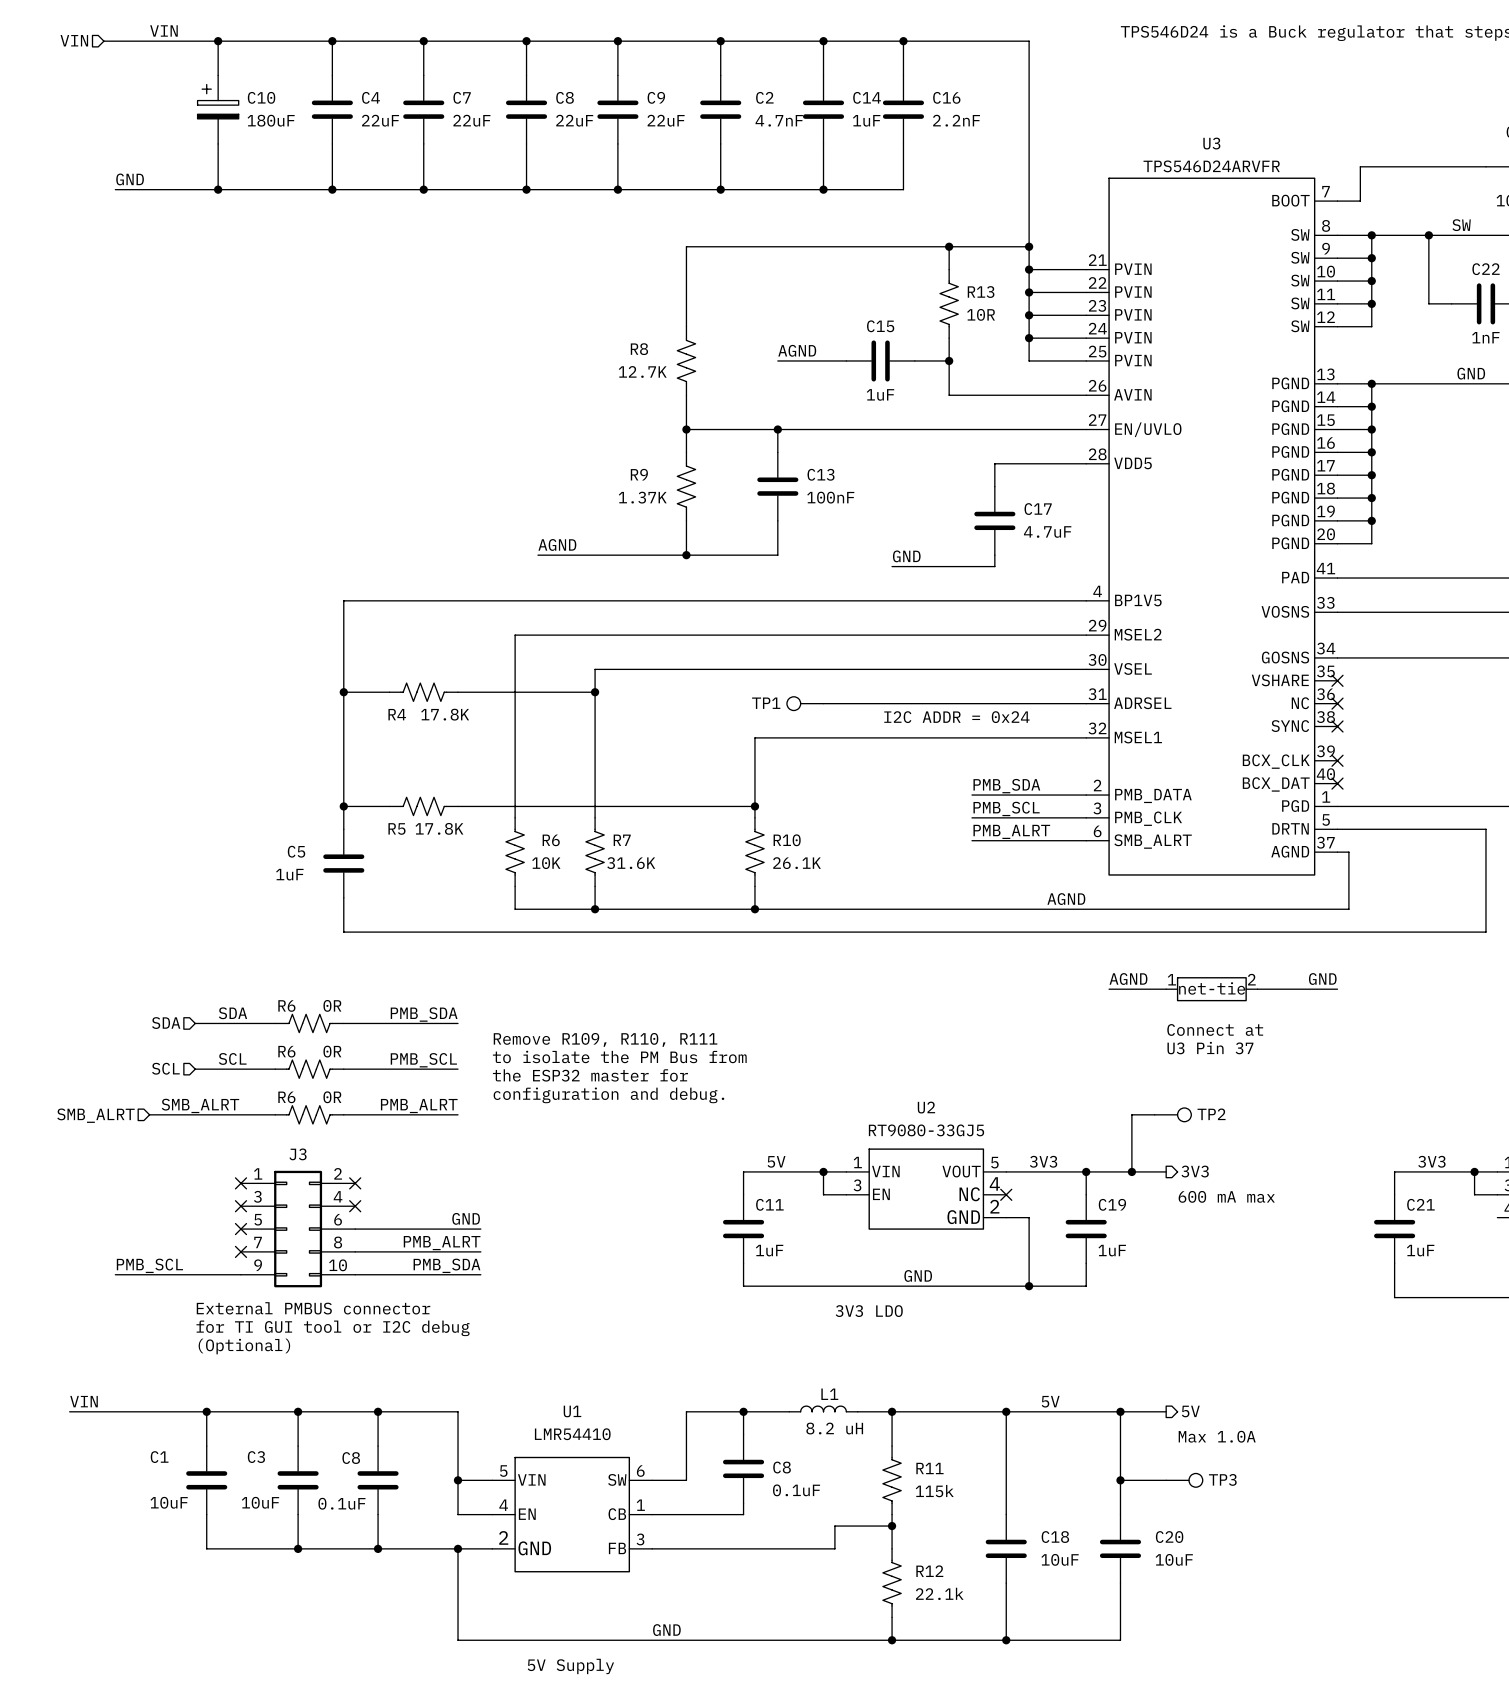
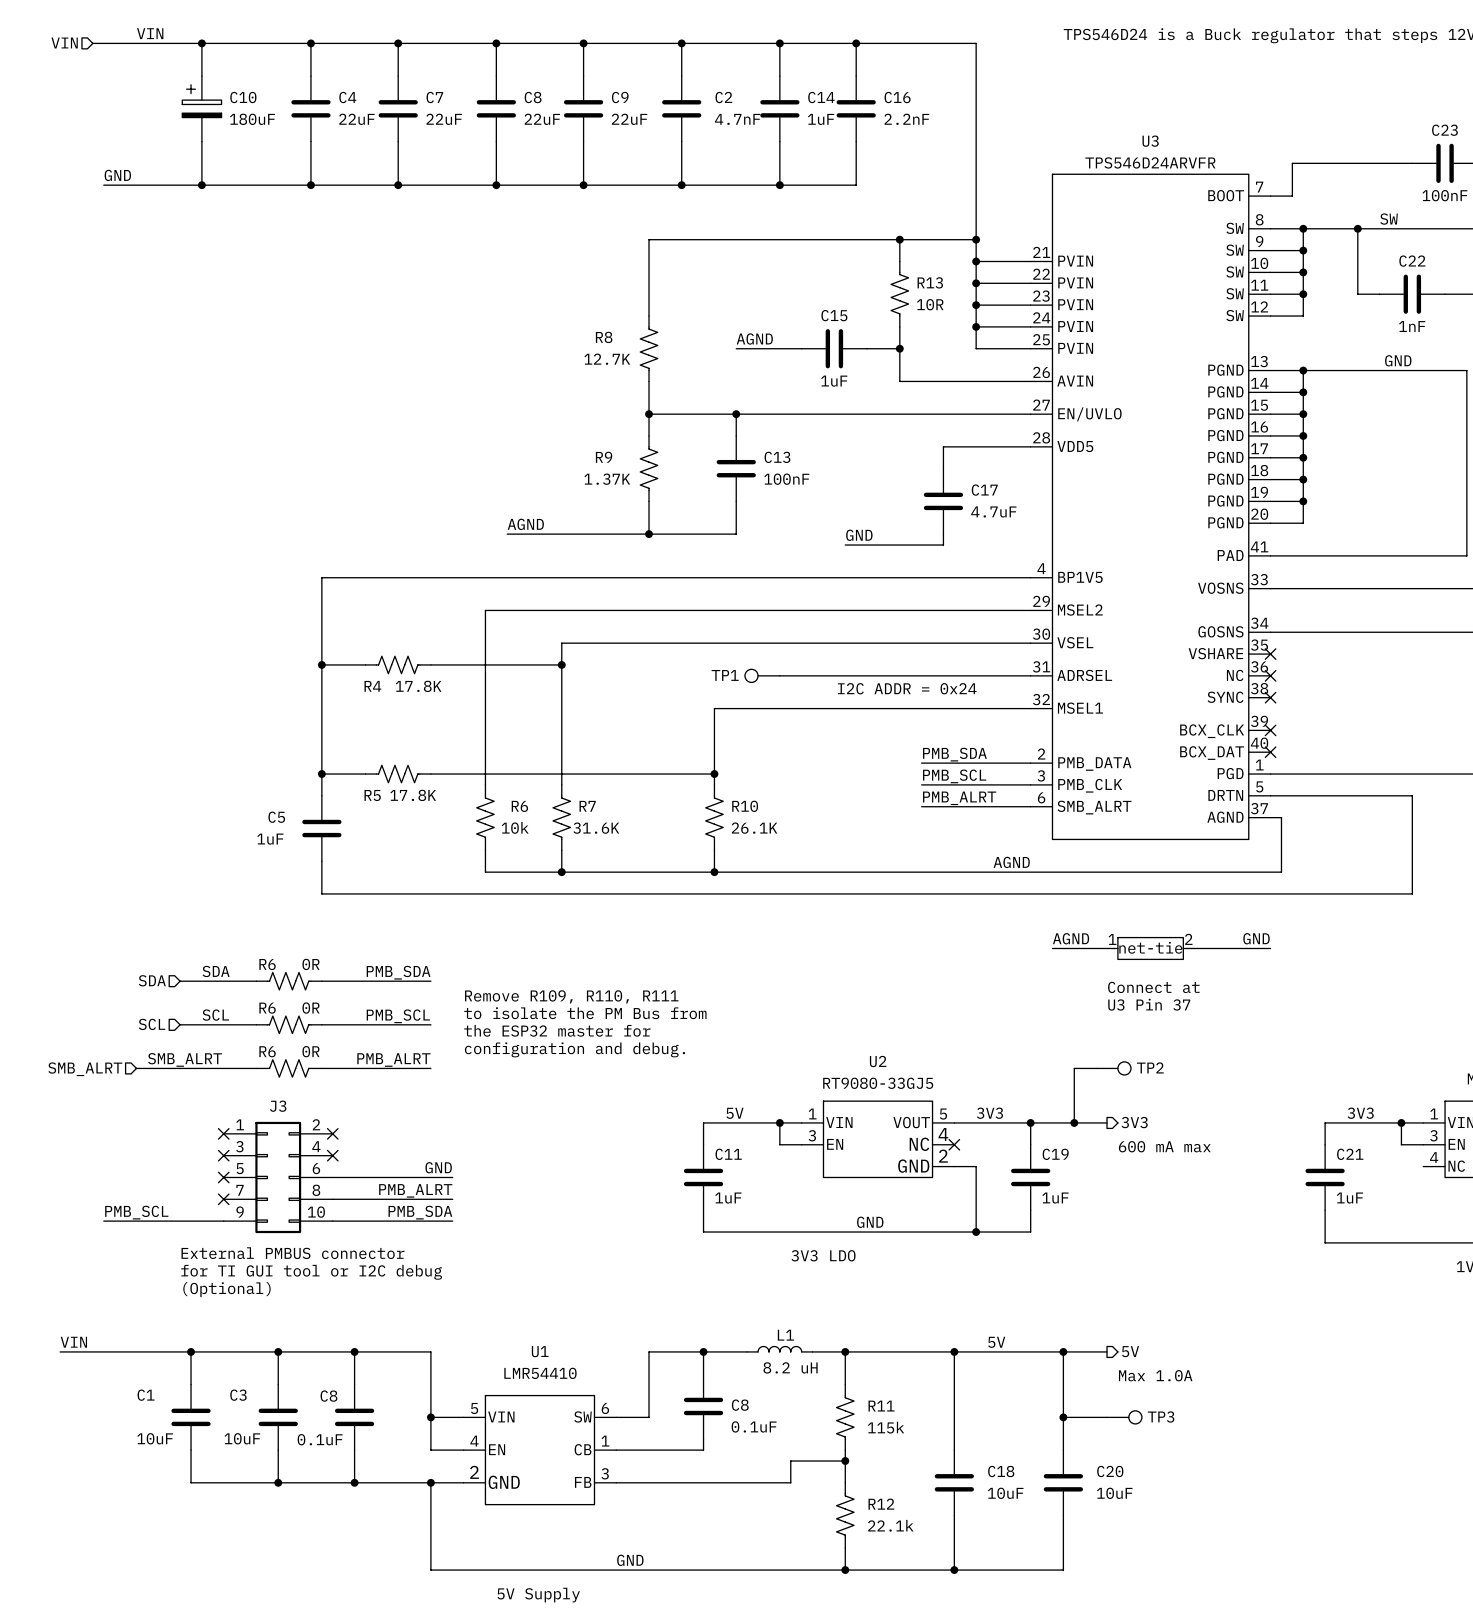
R6 value: 10K (546, 863) -> 10k (515, 827)

